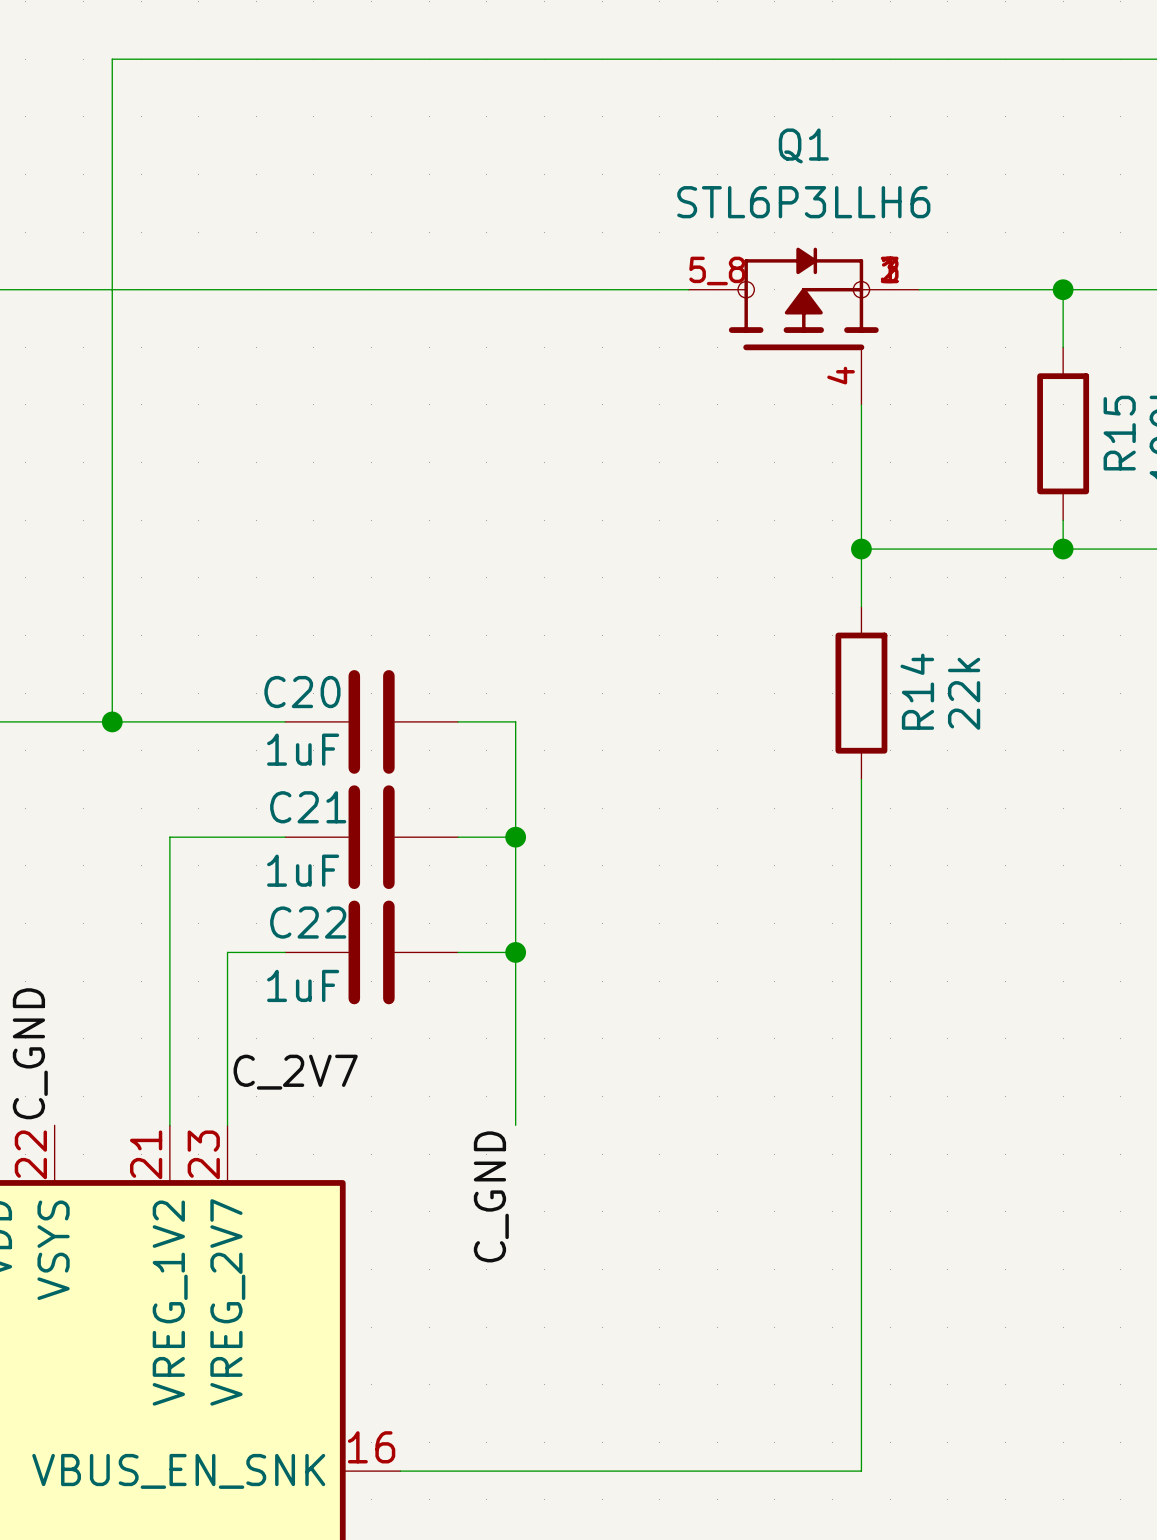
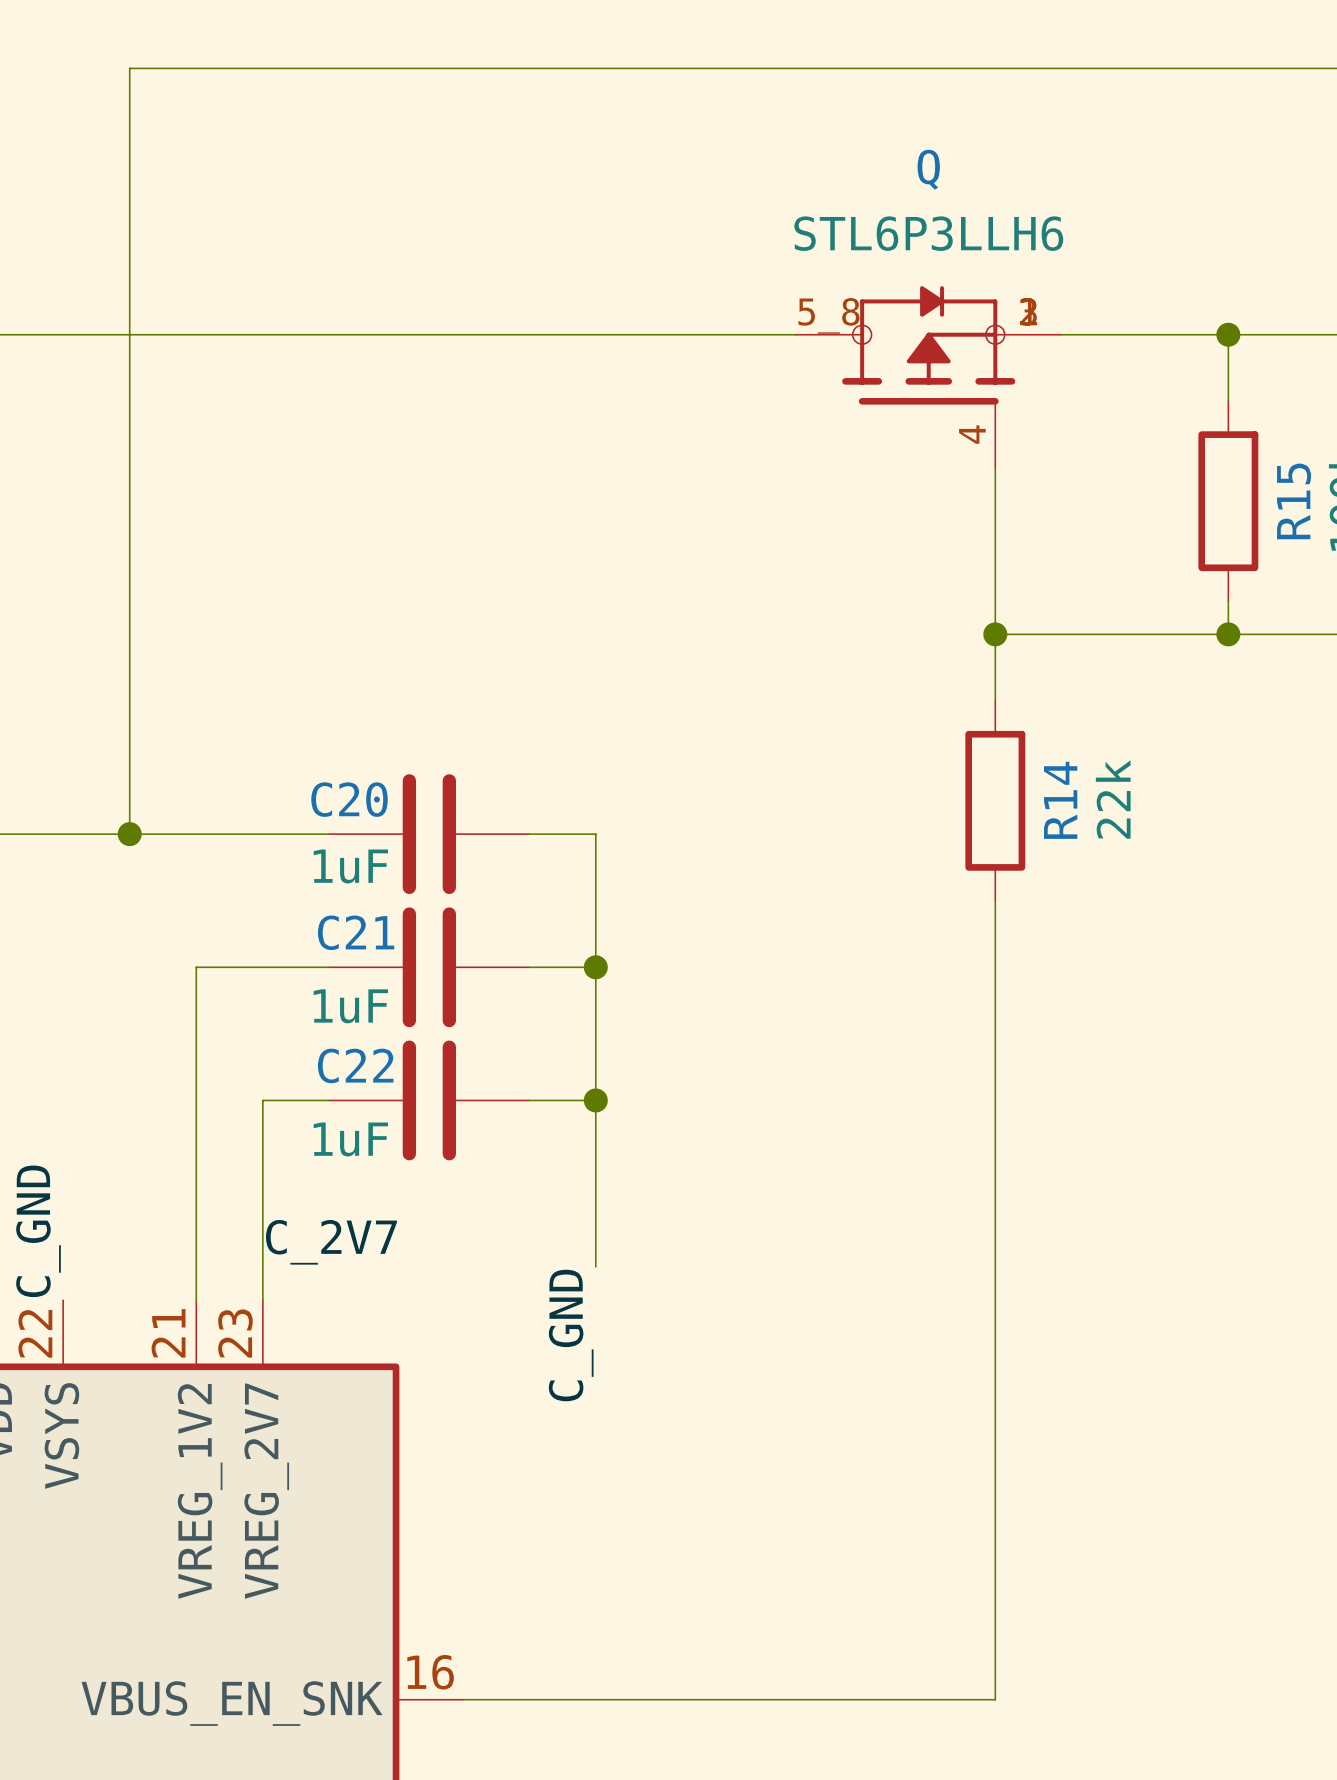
Q1 name: Q1 (803, 145) -> Q (928, 169)
wire: (515, 1096) (515, 1125) -> none
label position: C_GND (491, 1196) -> C_GND (571, 1335)

